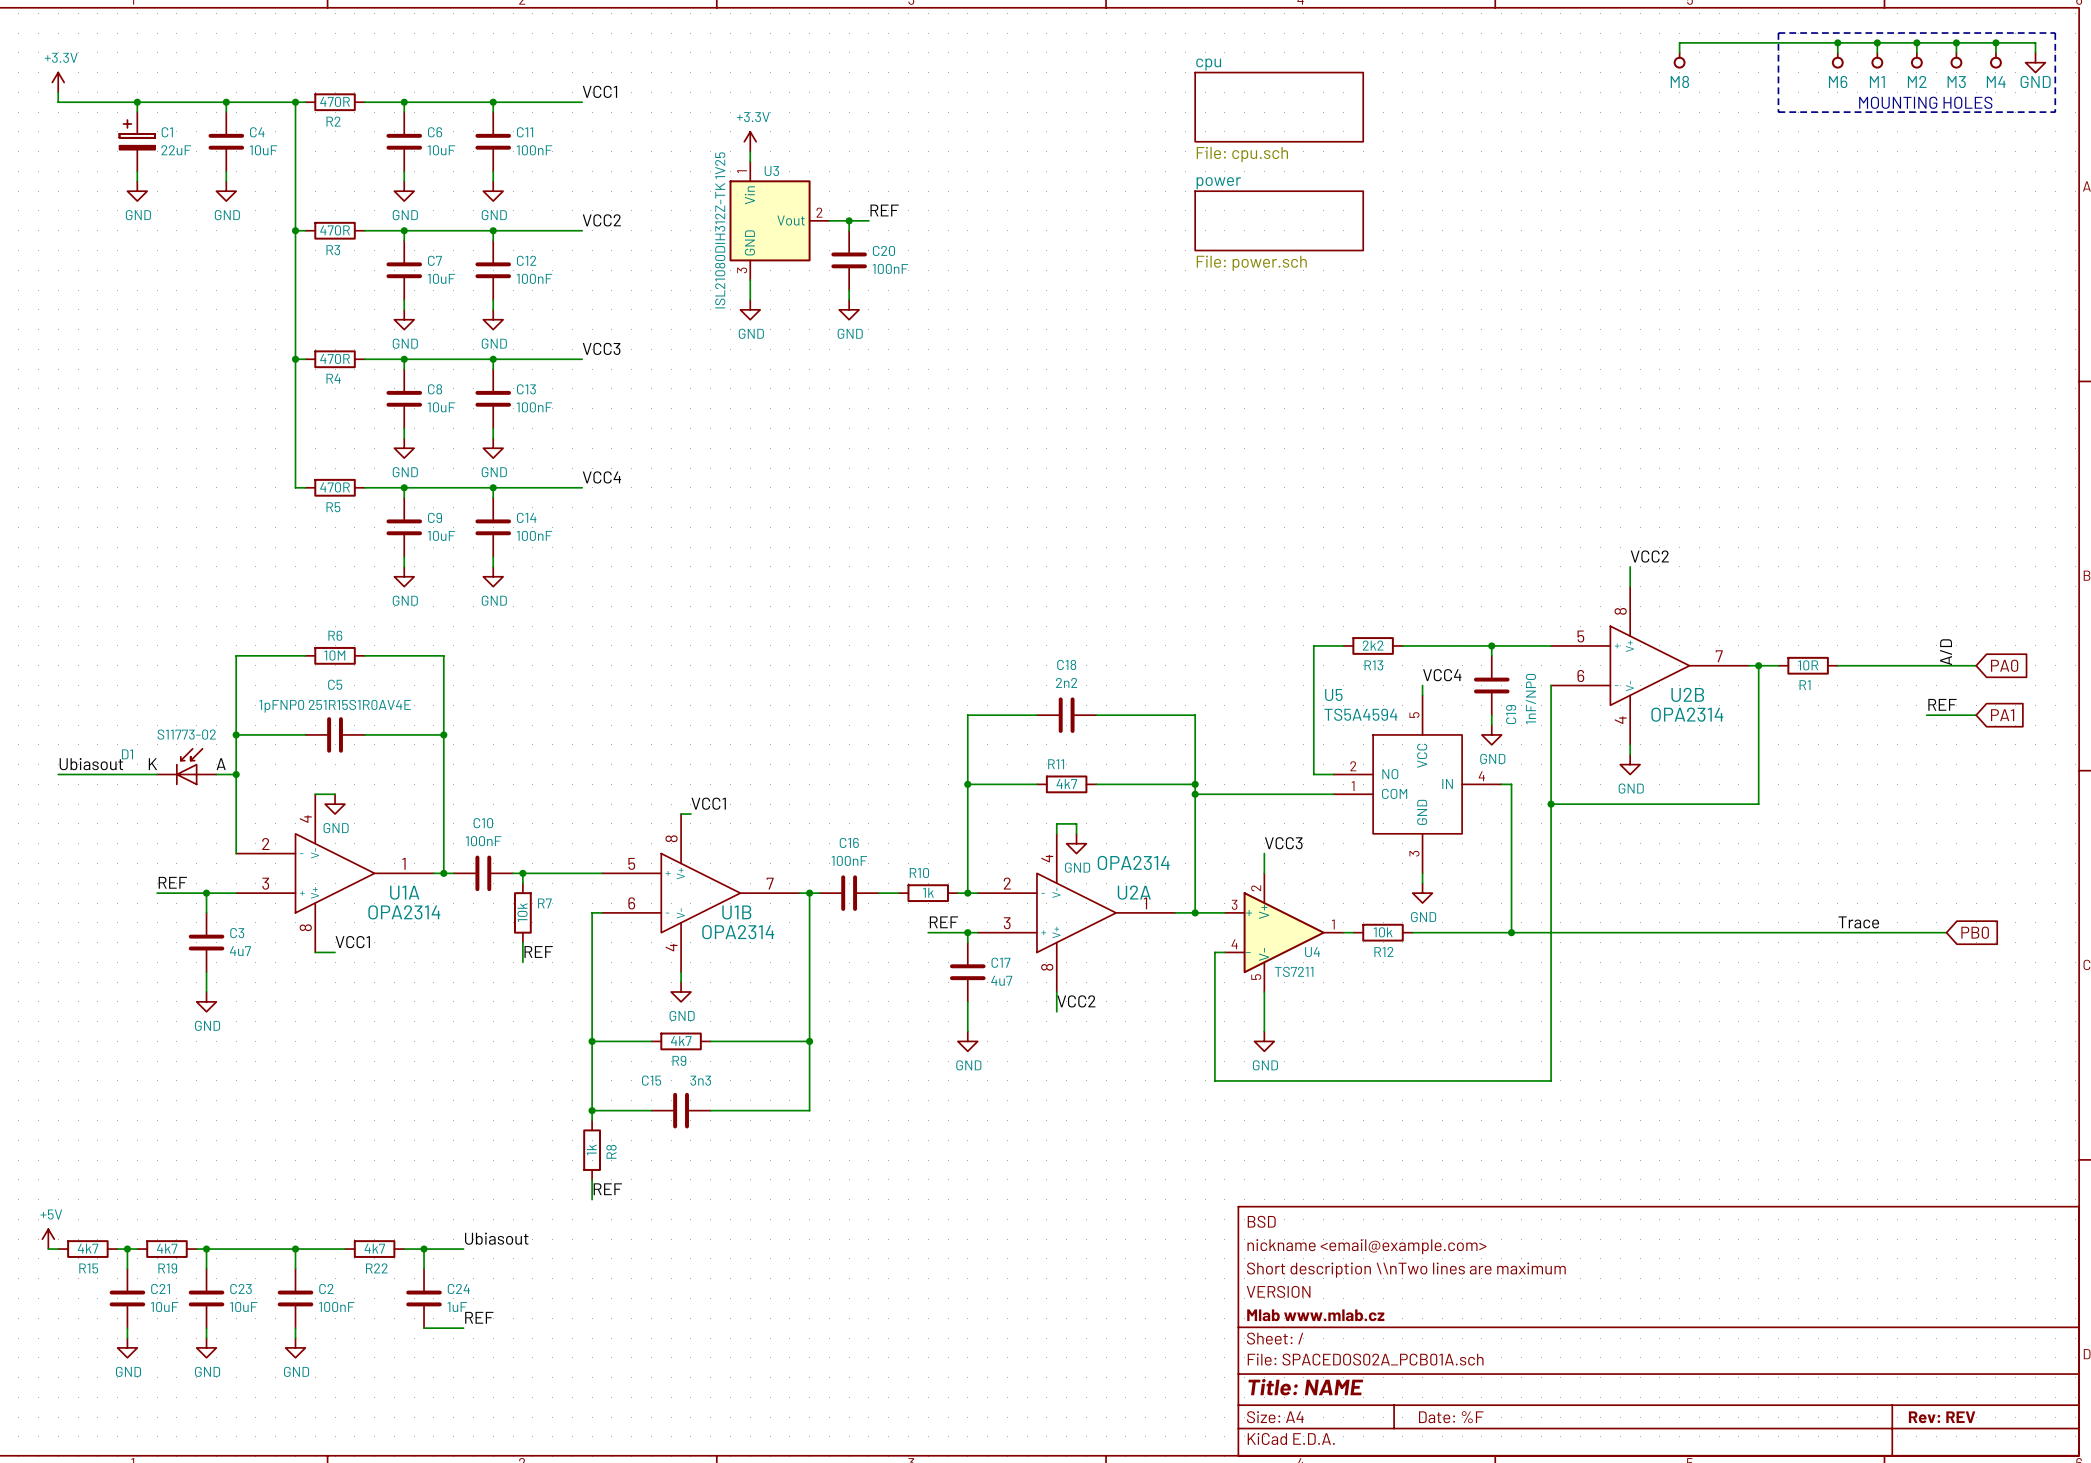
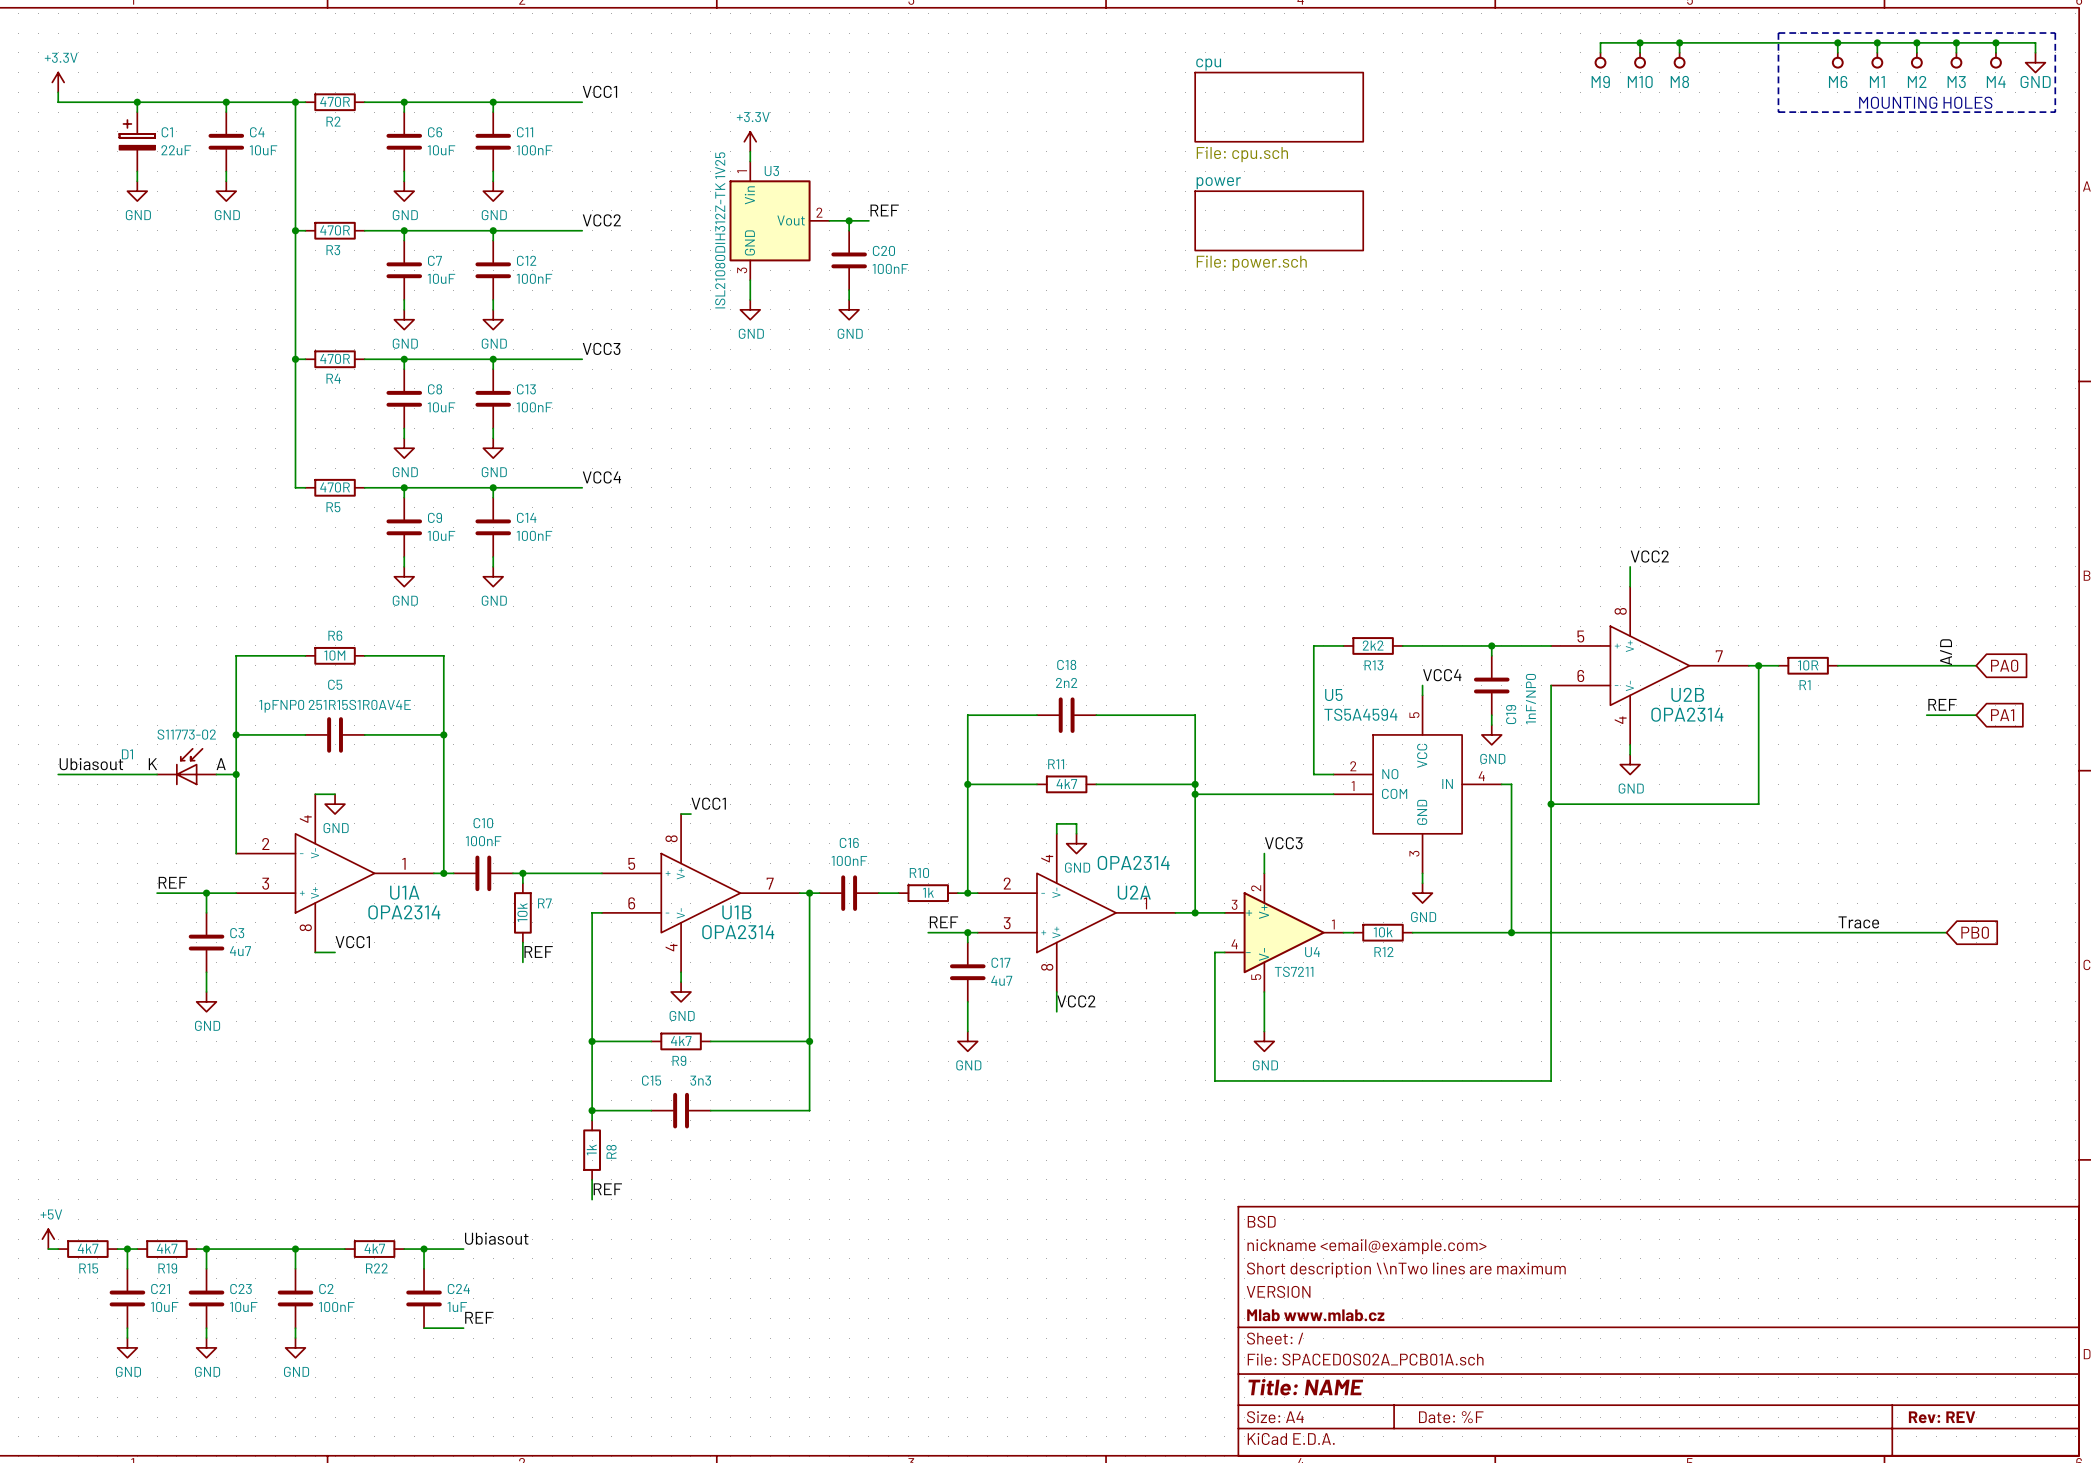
wire: none -> (1640, 42) (1640, 52)
junction: none -> (1640, 42)
wire: none -> (1679, 42) (1600, 42) (1600, 52)
junction: none -> (1679, 42)
M9: none -> (1600, 60)
M10: none -> (1640, 60)

